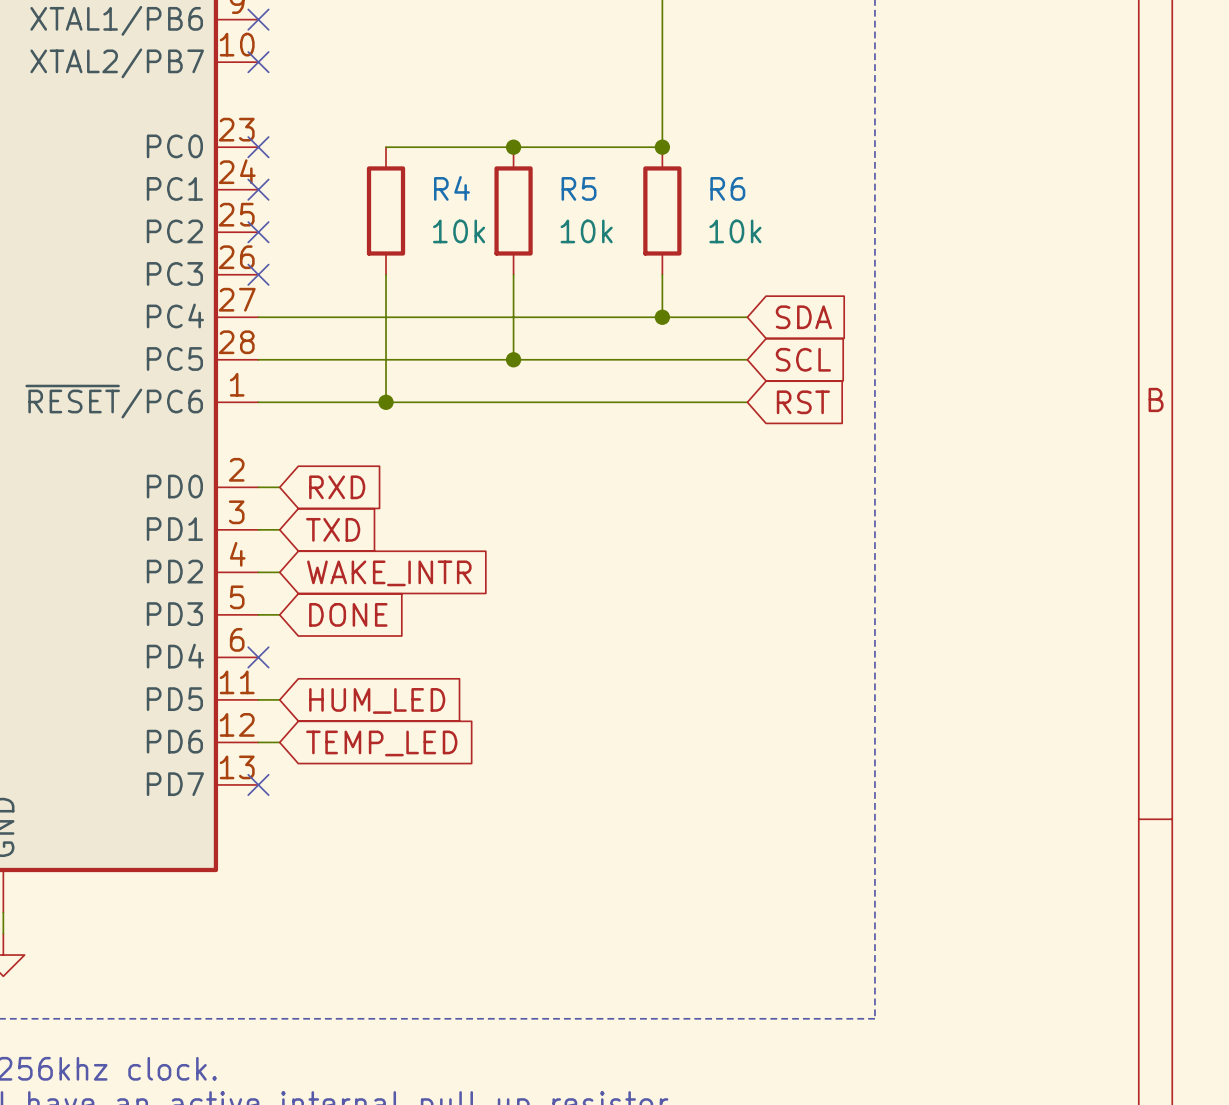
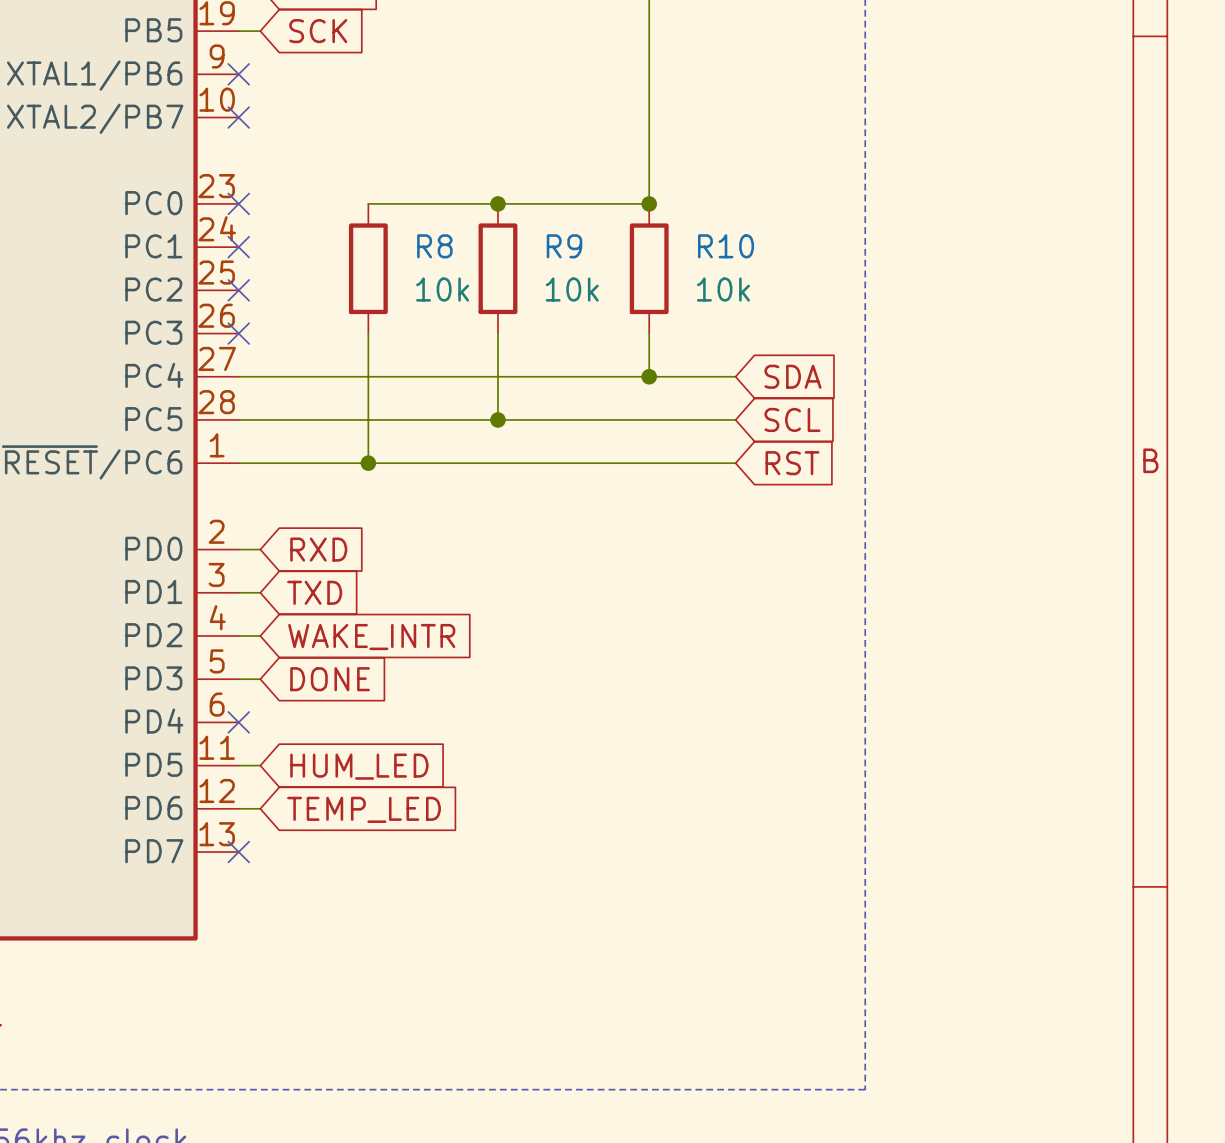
R4 name: R4 (451, 188) -> R8 (434, 246)
R5 name: R5 (579, 188) -> R9 (564, 246)
R6 name: R6 (727, 188) -> R10 (726, 246)

